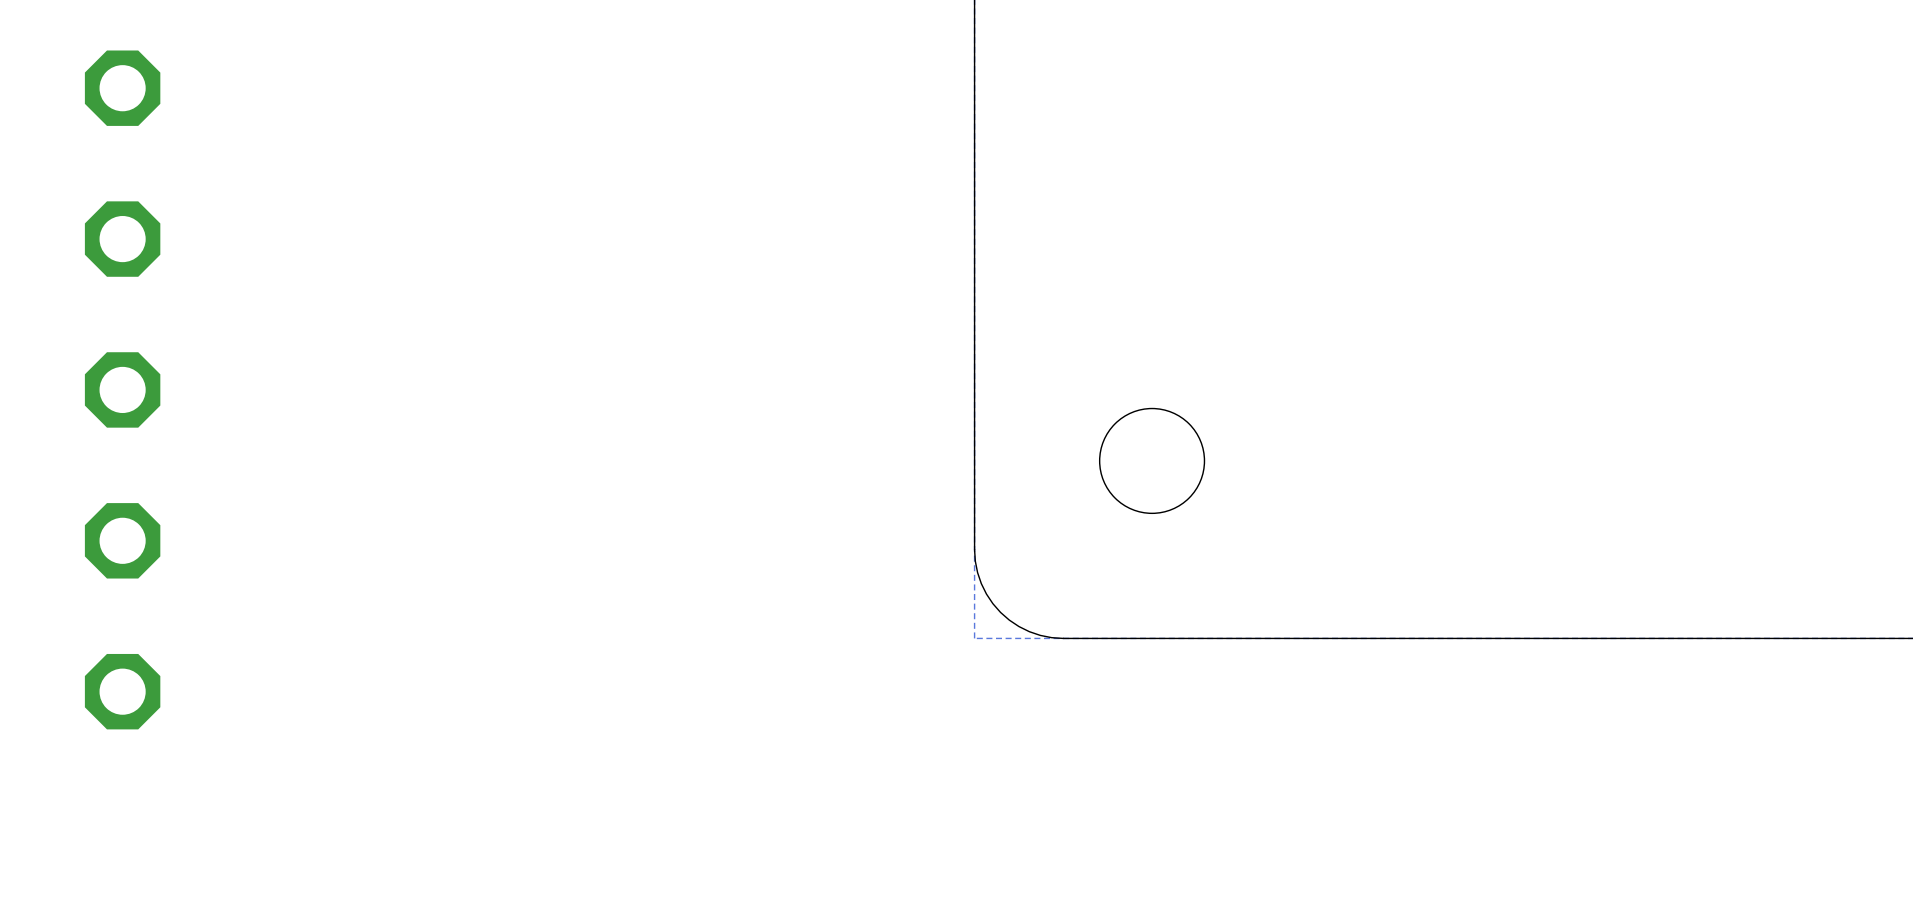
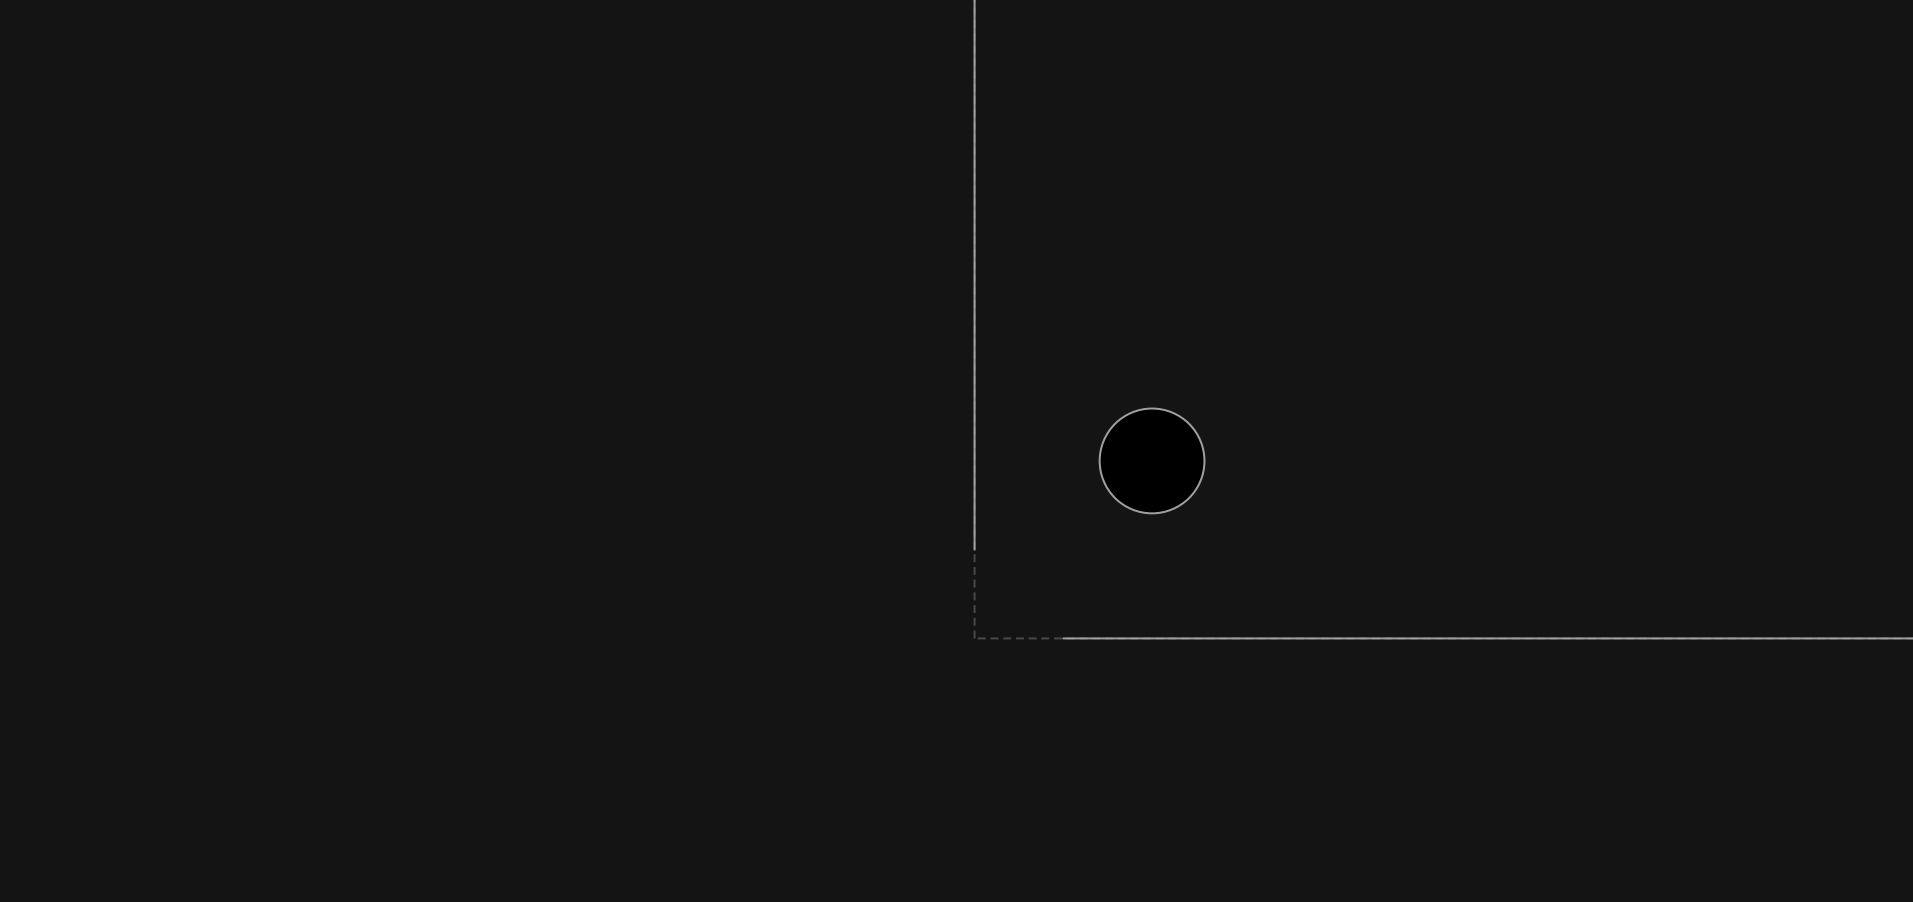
part: (122, 88) -> none
part: (122, 239) -> none
part: (122, 389) -> none
part: (122, 540) -> none
board edge: (974, 549) (977, 572) (981, 583) (992, 603) (1000, 612) (1009, 620) (1029, 631) (1040, 635) (1063, 638) -> none
part: (122, 691) -> none

